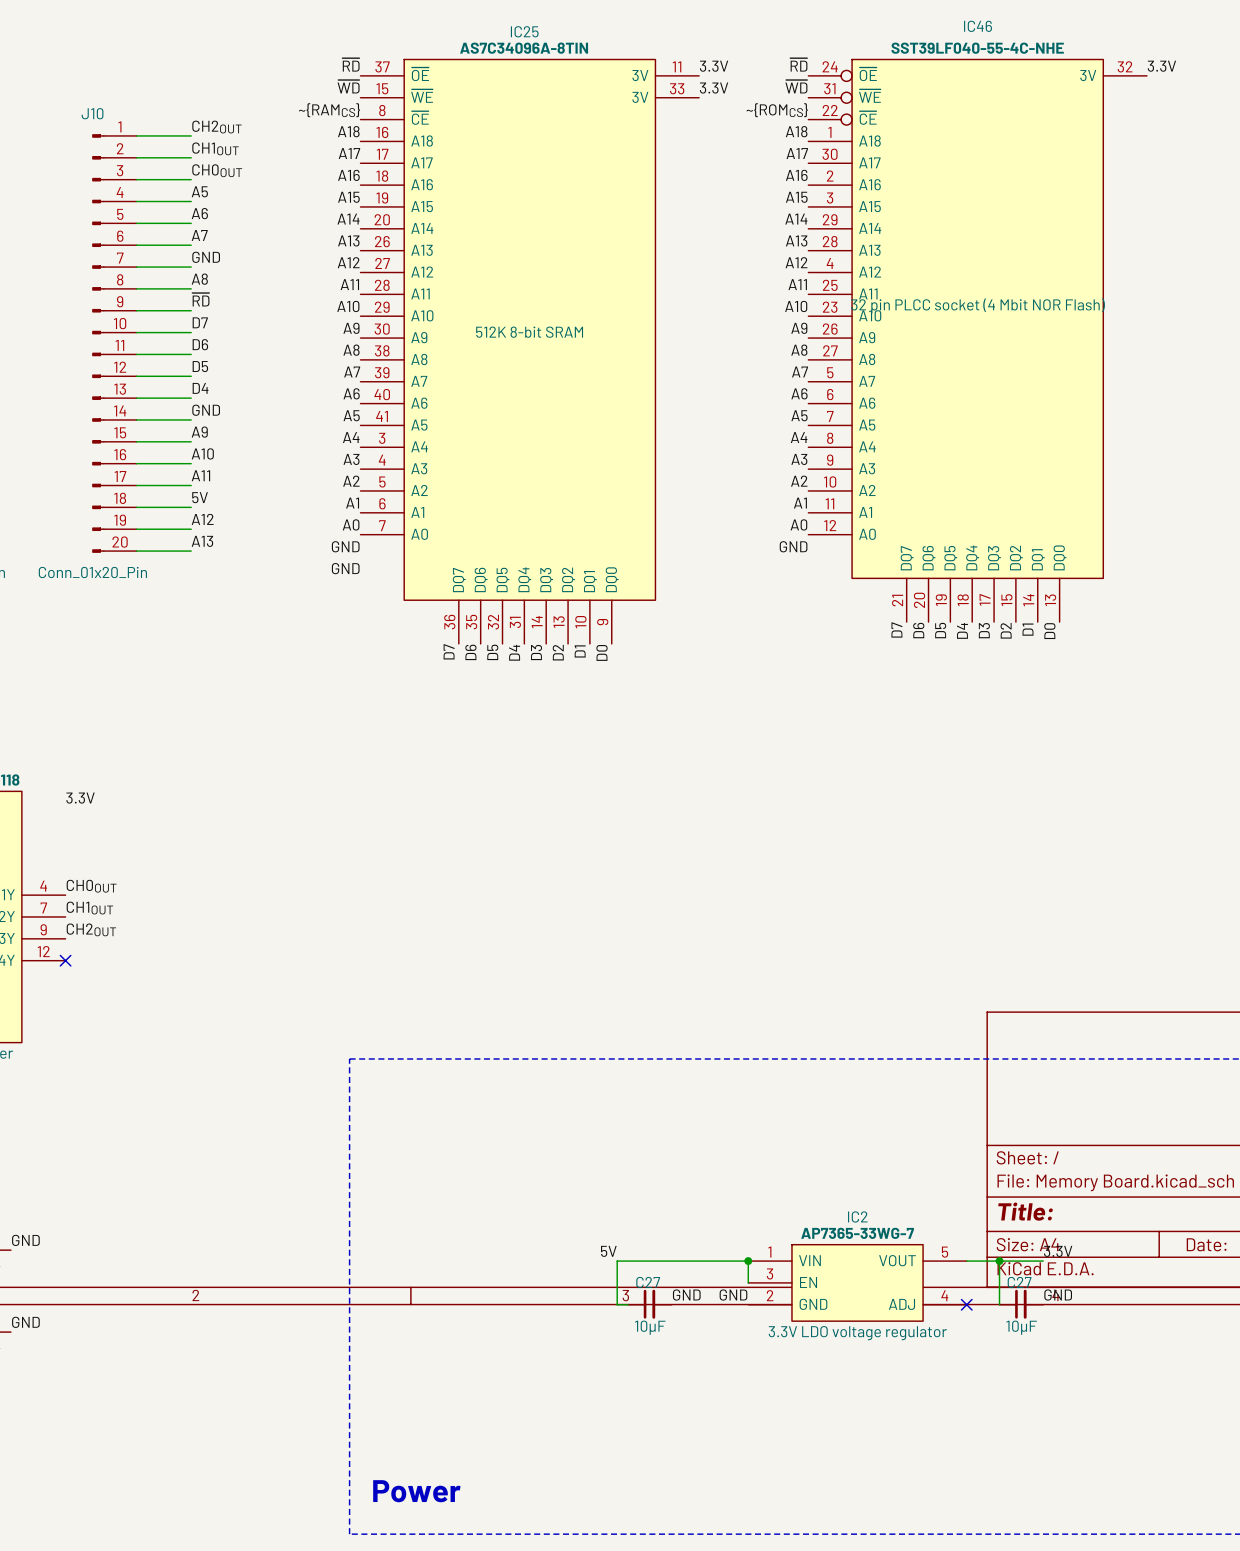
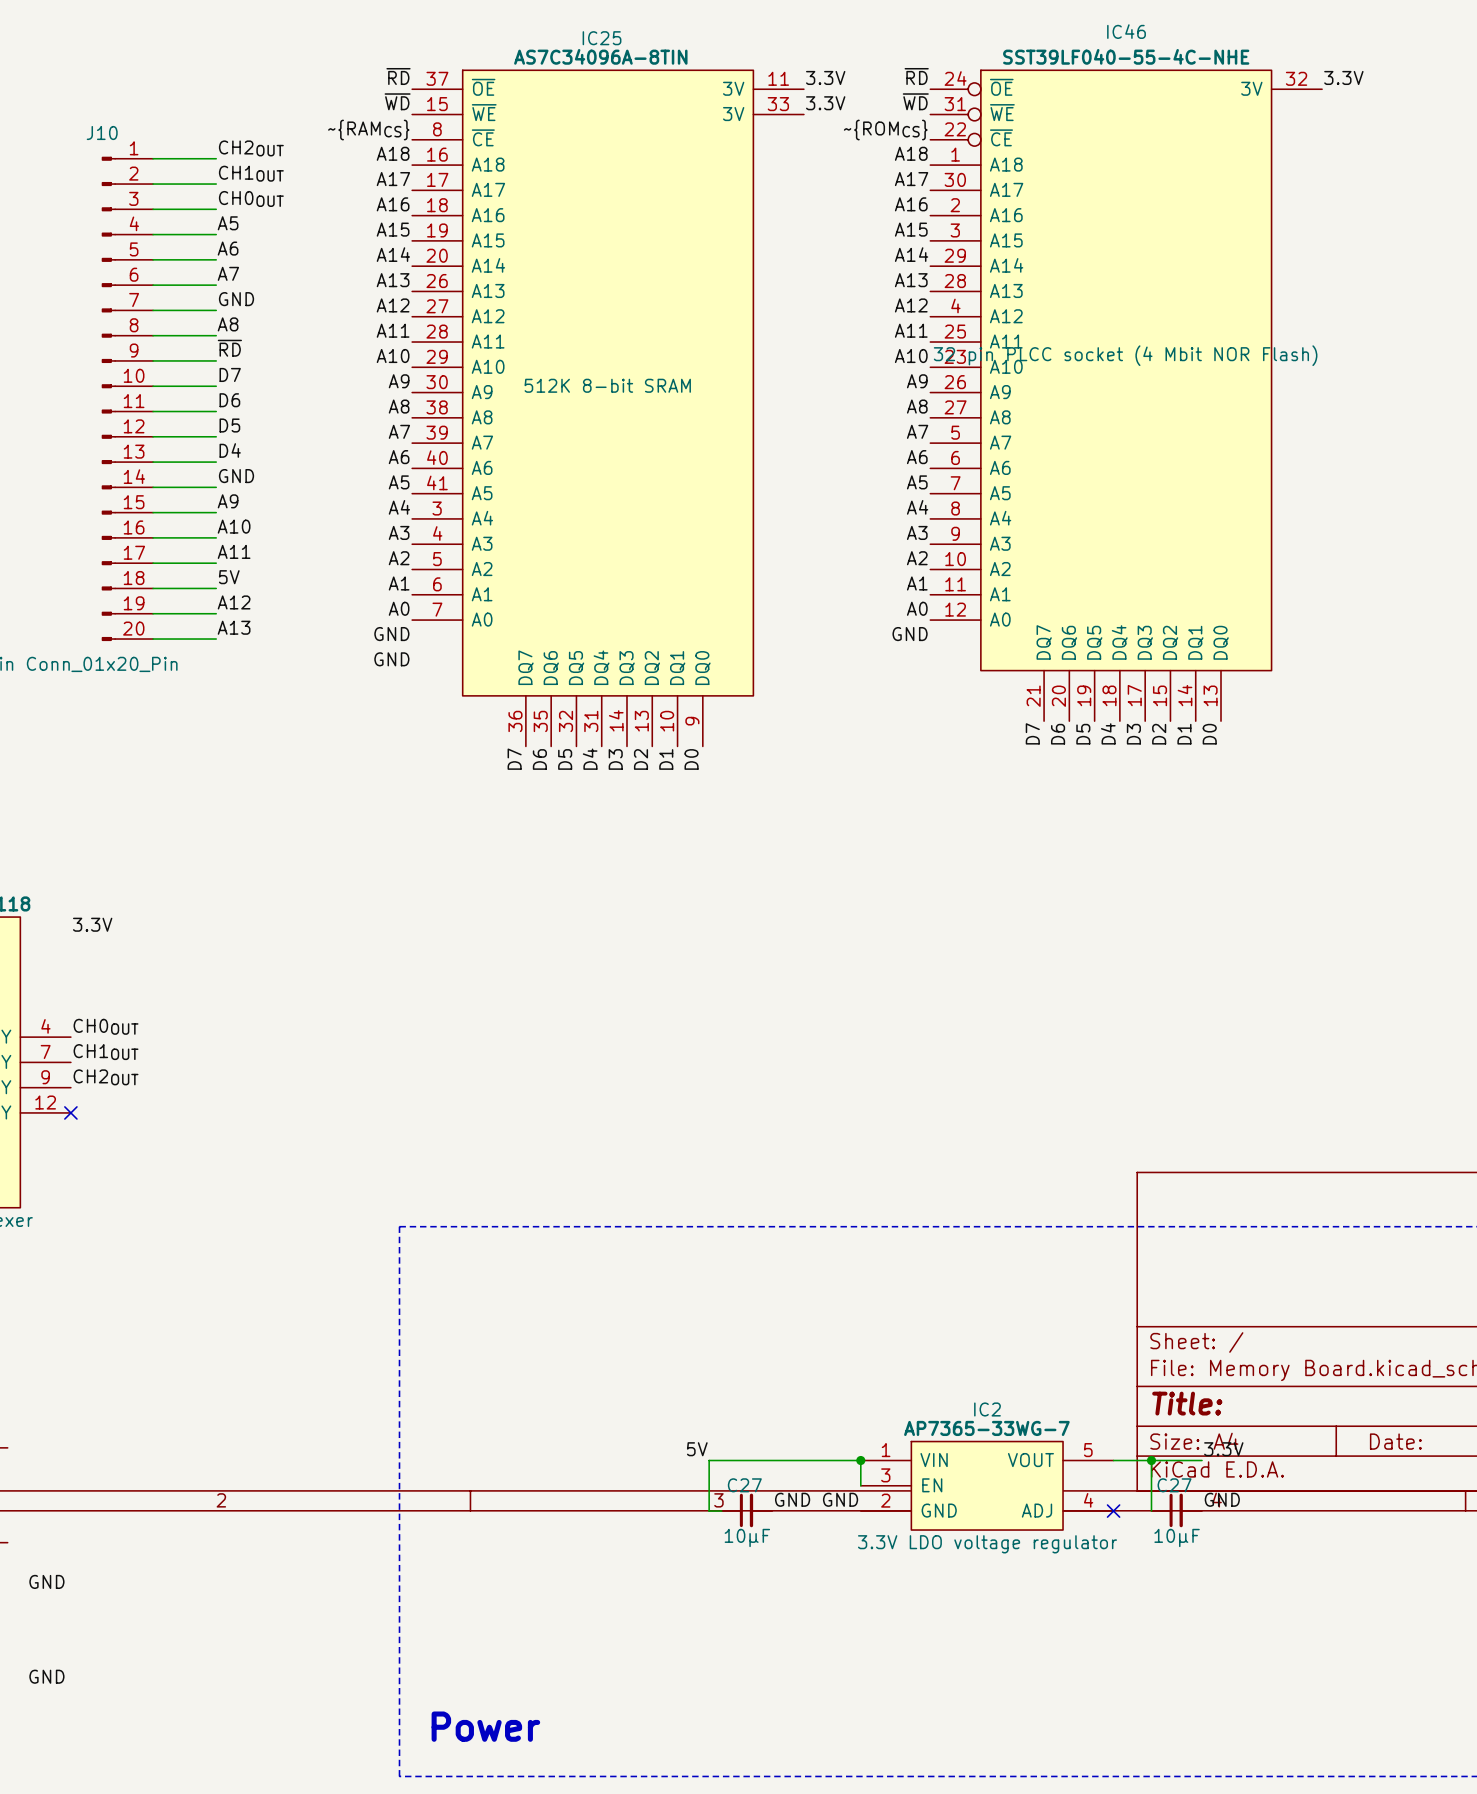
label: GND (25, 1240) -> none
label position: GND (25, 1322) -> GND (46, 1581)
label: none -> GND (46, 1676)

